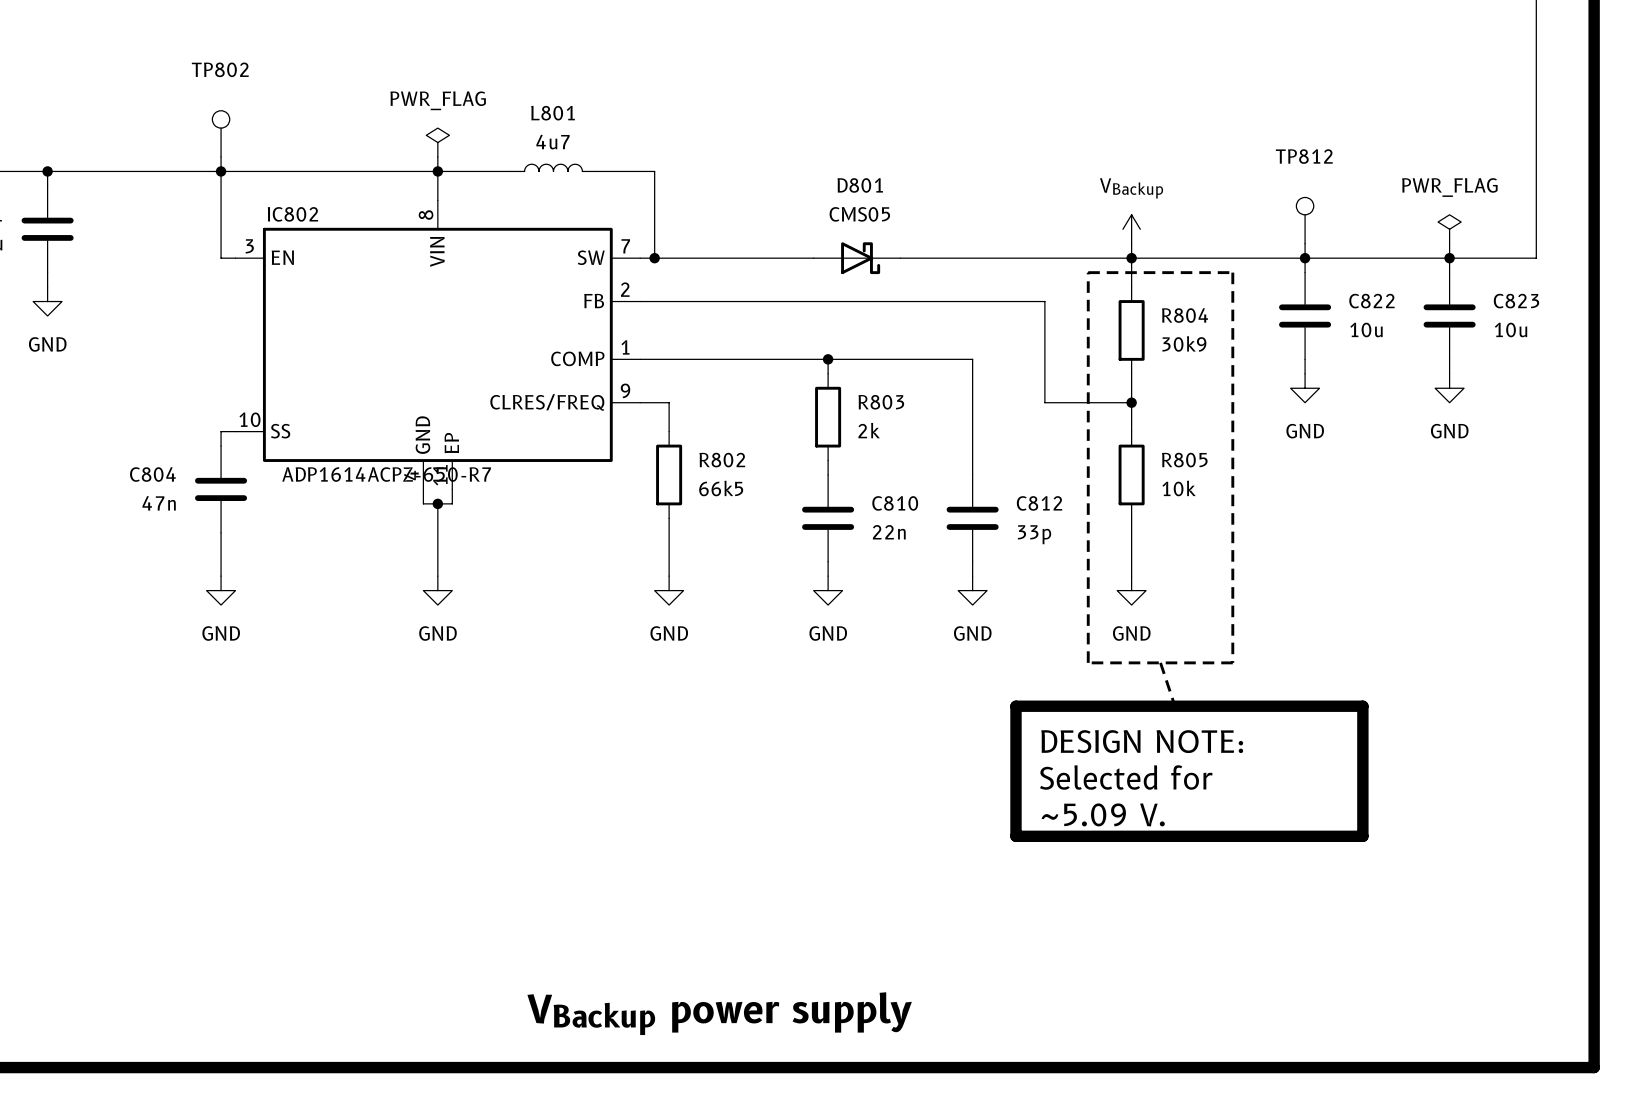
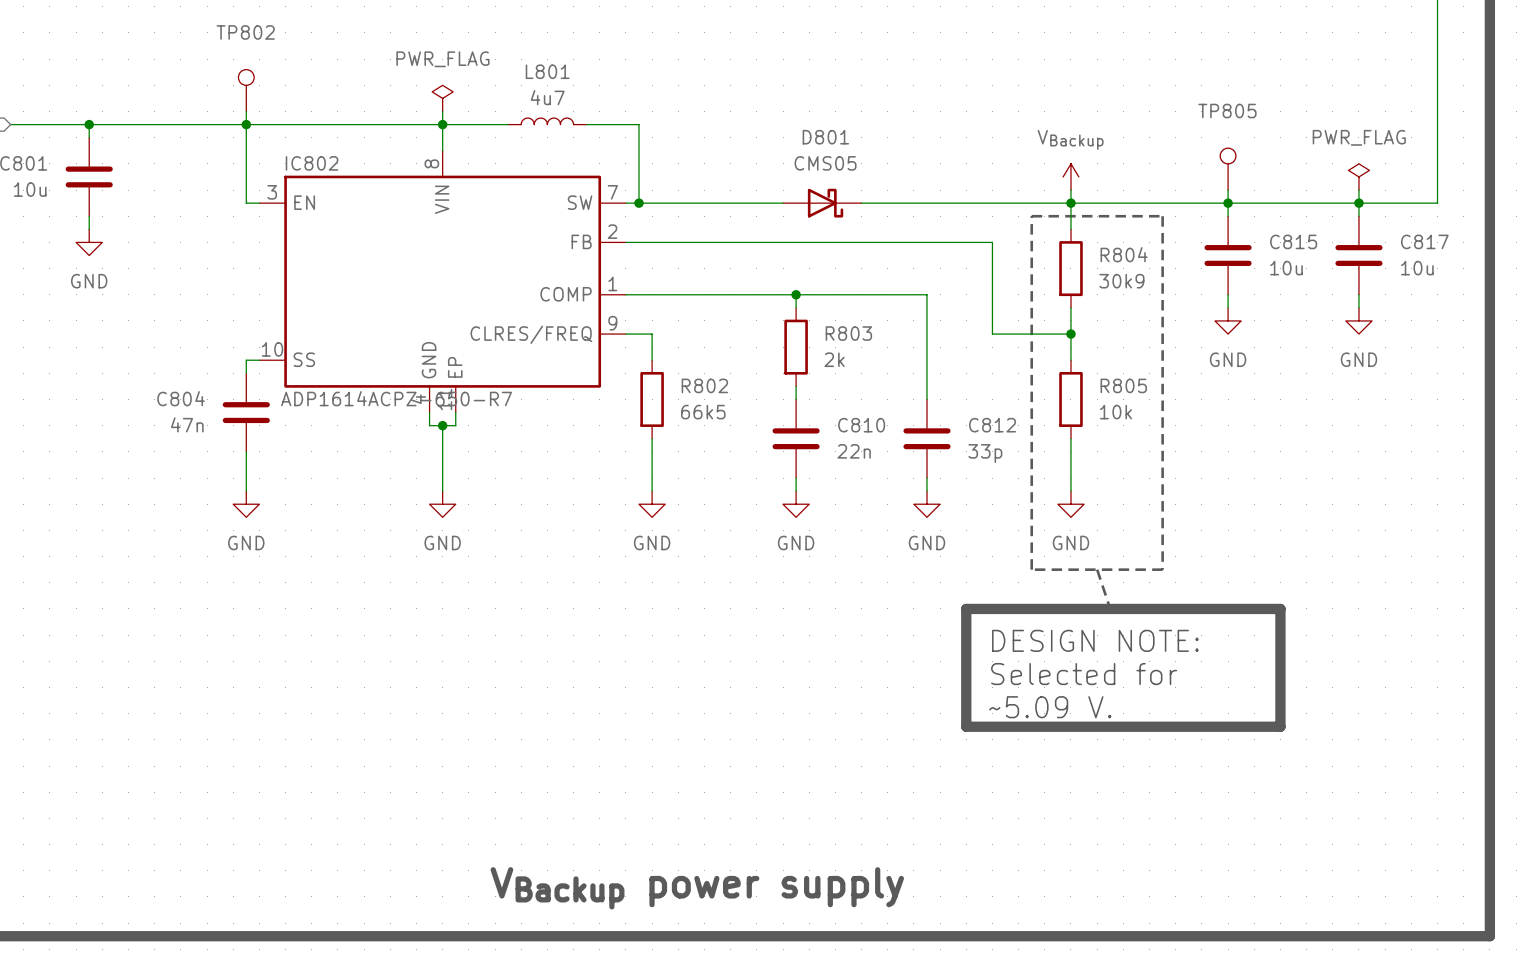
TP812 name: TP812 (1304, 156) -> TP805 (1227, 111)
C822 name: C822 (1371, 301) -> C815 (1293, 241)
C823 name: C823 (1516, 301) -> C817 (1424, 241)

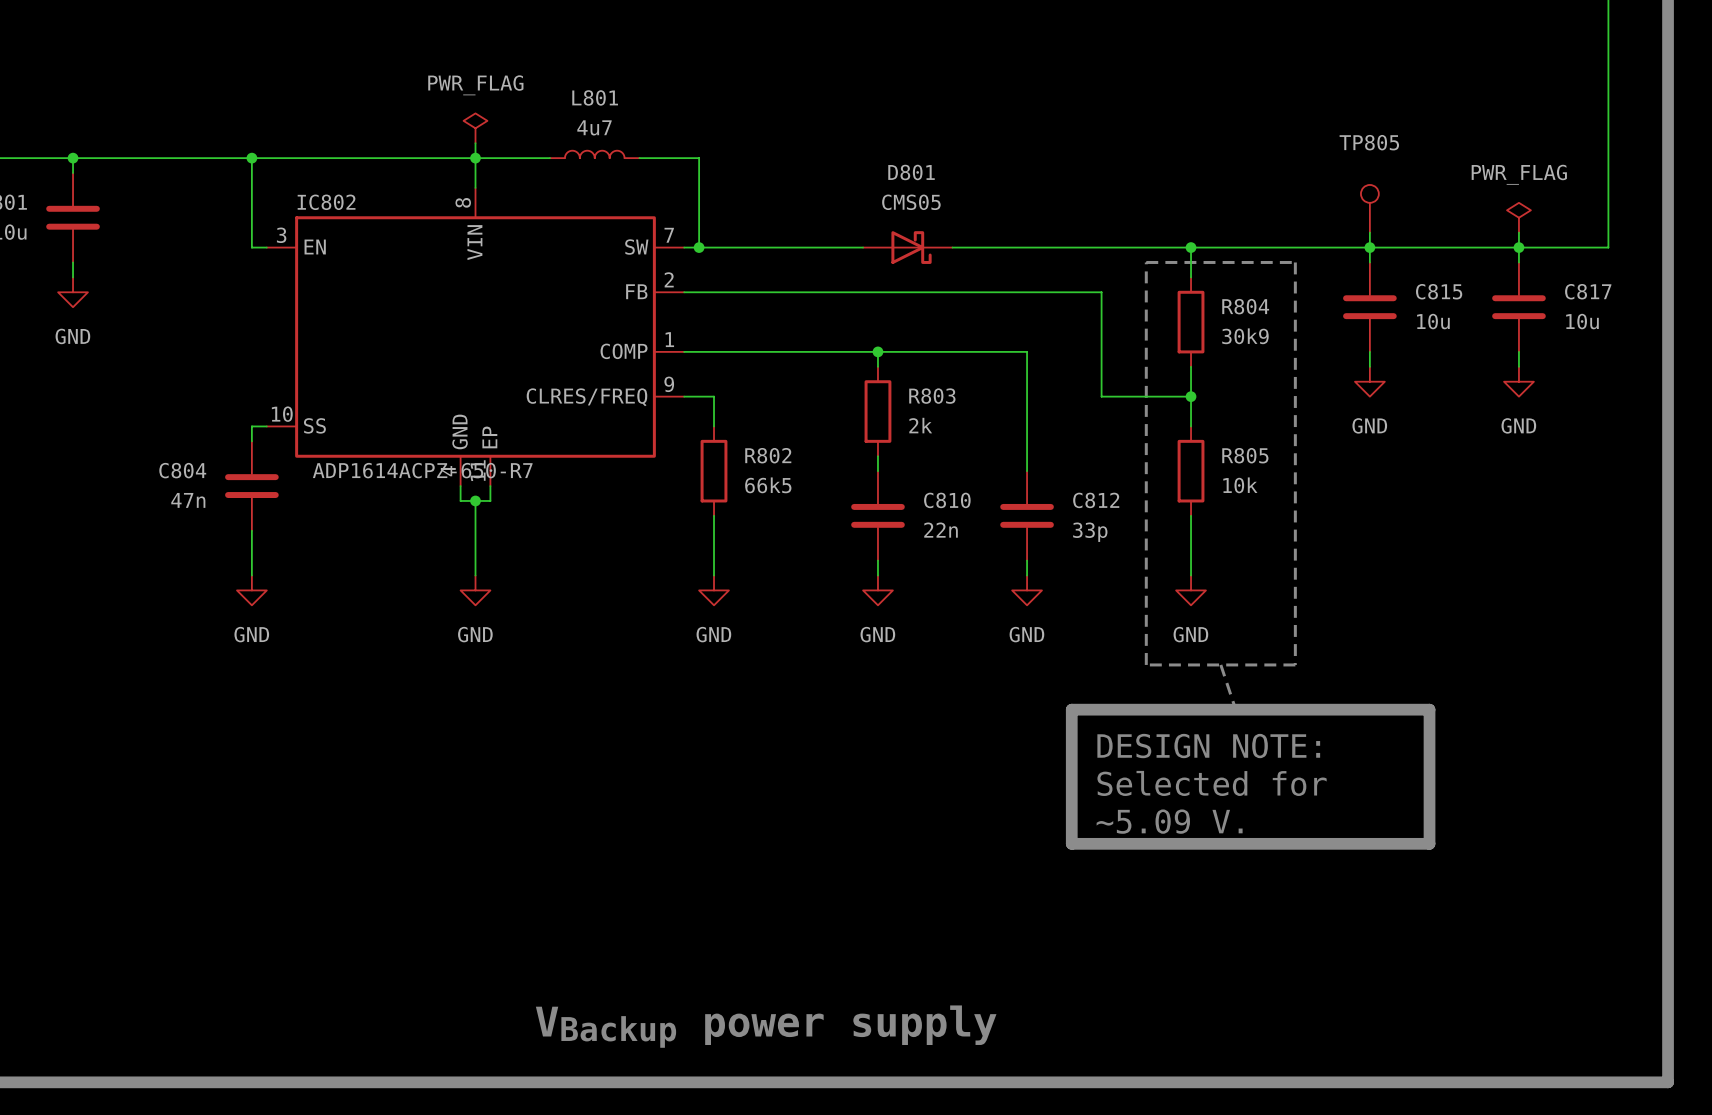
TP802: (246, 90) -> none
wire: (246, 111) (246, 124) -> none
power symbol: VBackup (1070, 176) -> none
wire: (1070, 190) (1070, 203) -> none

